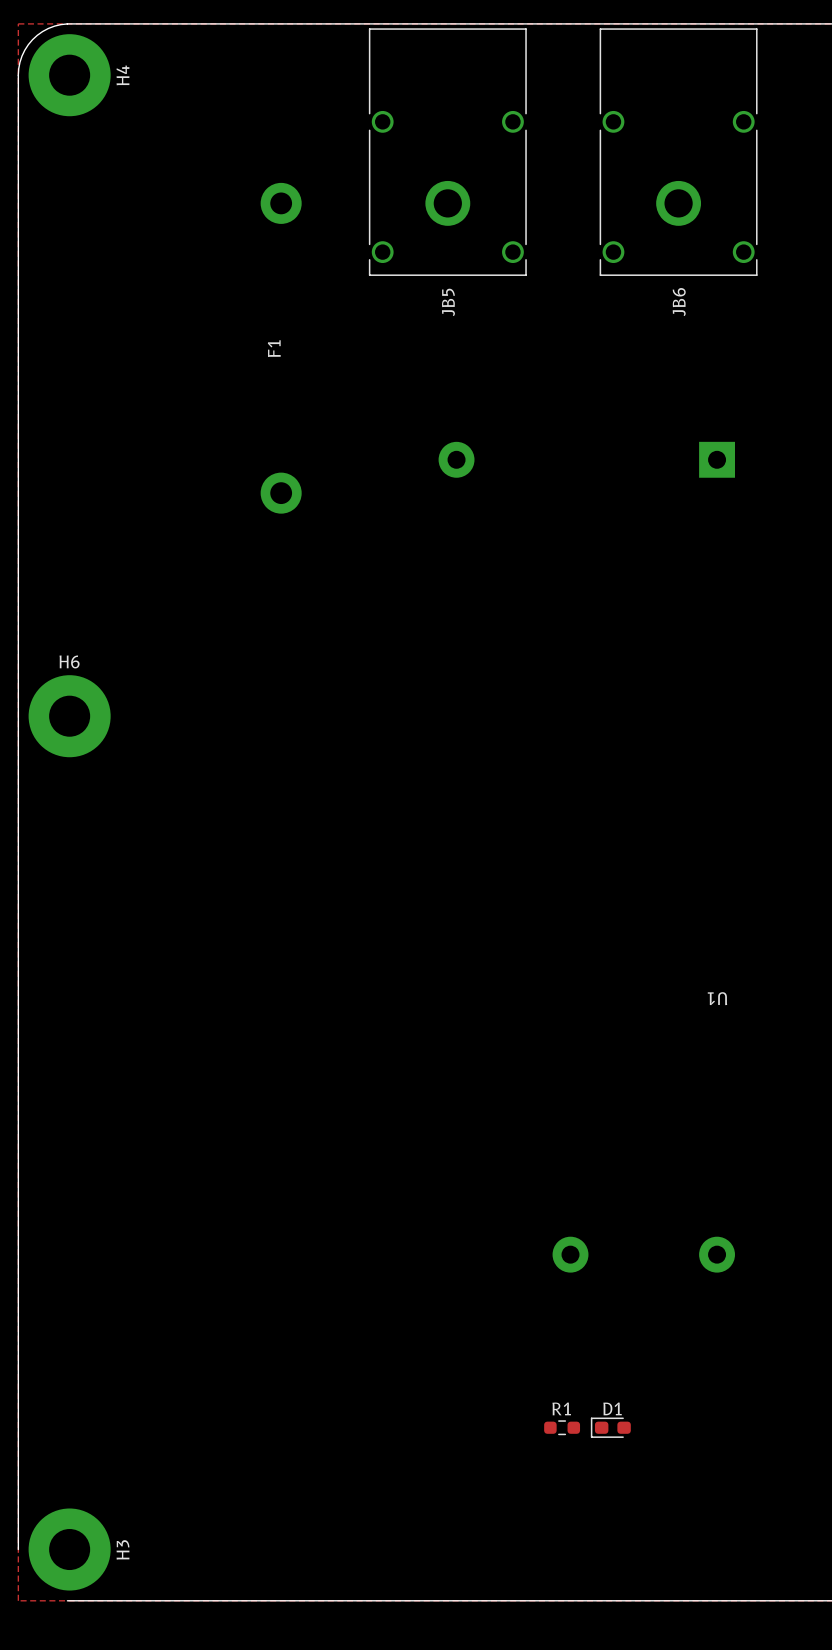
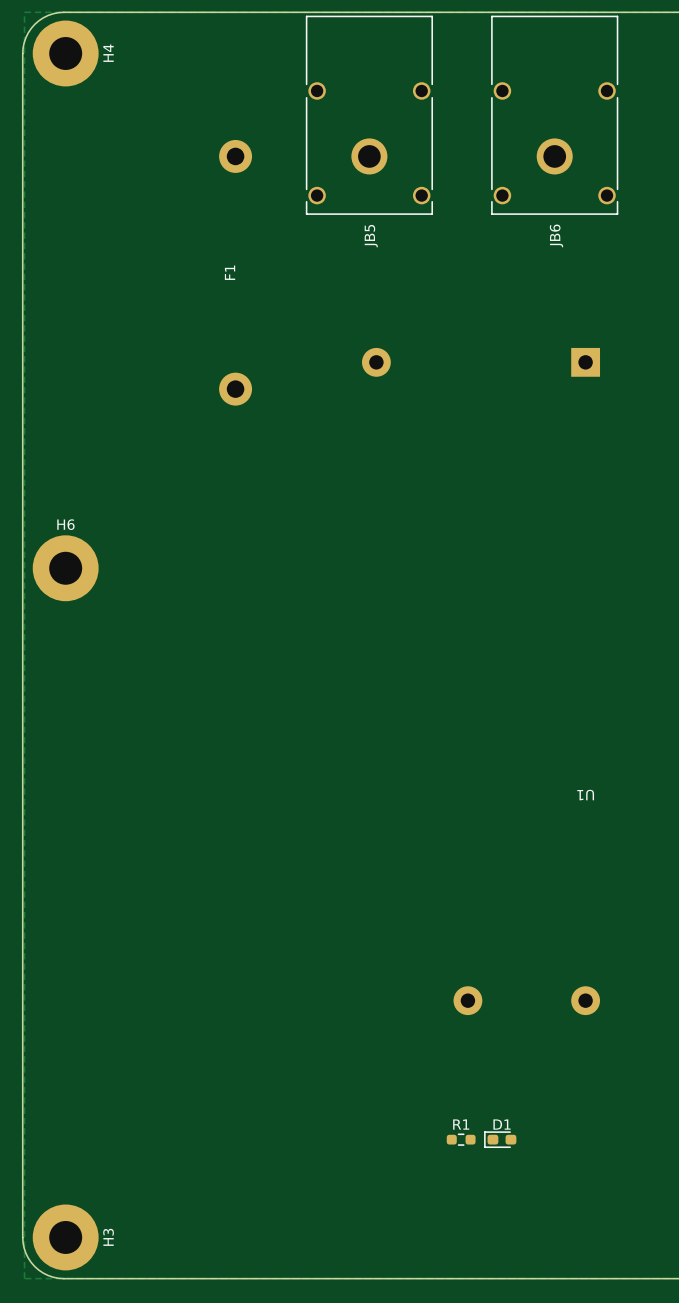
board edge: (67, 23) (48, 28) (32, 39) (22, 56) (18, 75) (18, 1549) -> (63, 12) (48, 15) (34, 24) (25, 37) (22, 53) (22, 1237) (25, 1253) (34, 1266) (48, 1275) (63, 1278)

